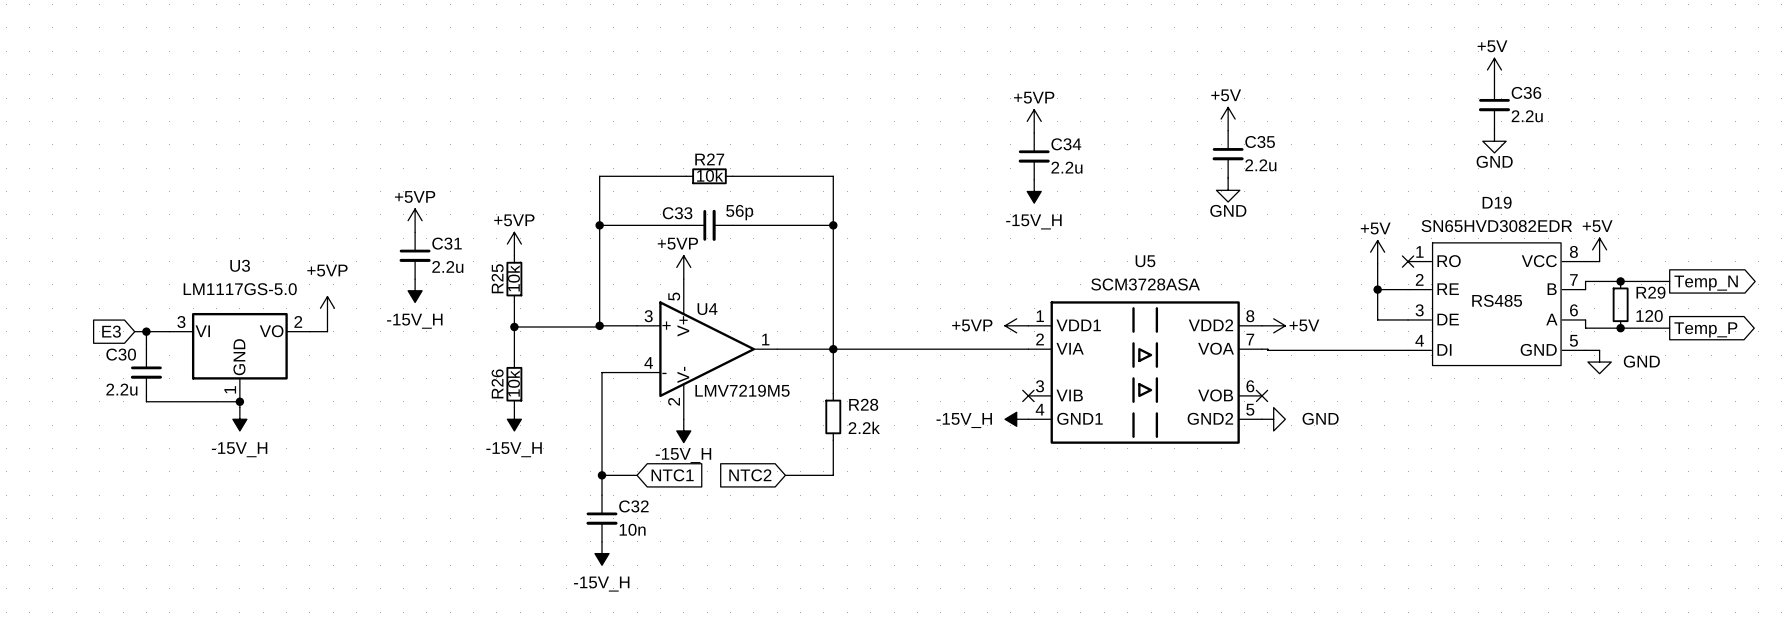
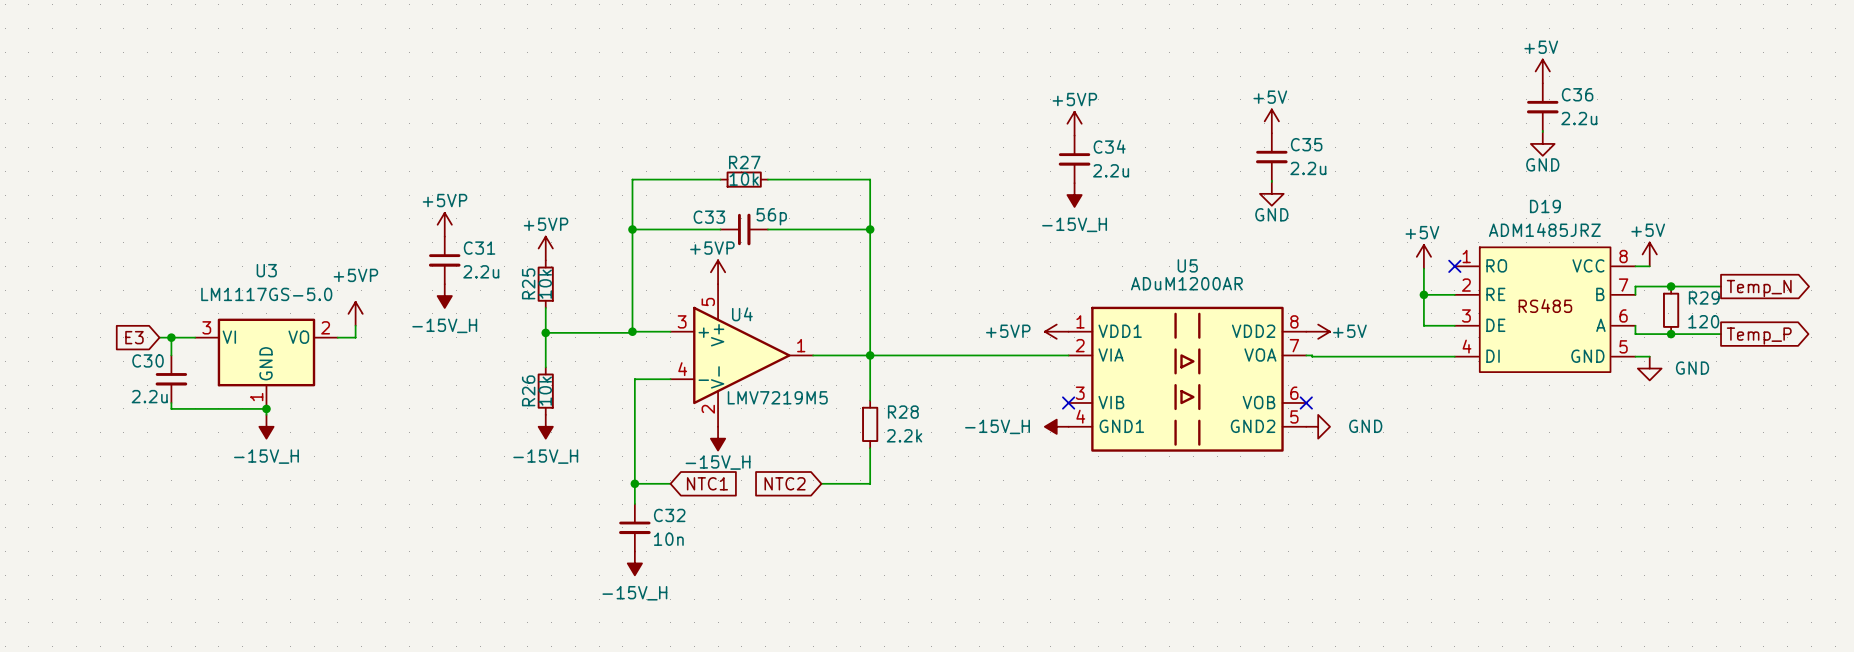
D19 value: SN65HVD3082EDR (1496, 226) -> ADM1485JRZ (1544, 229)
U5 value: SCM3728ASA (1145, 284) -> ADuM1200AR (1186, 283)

